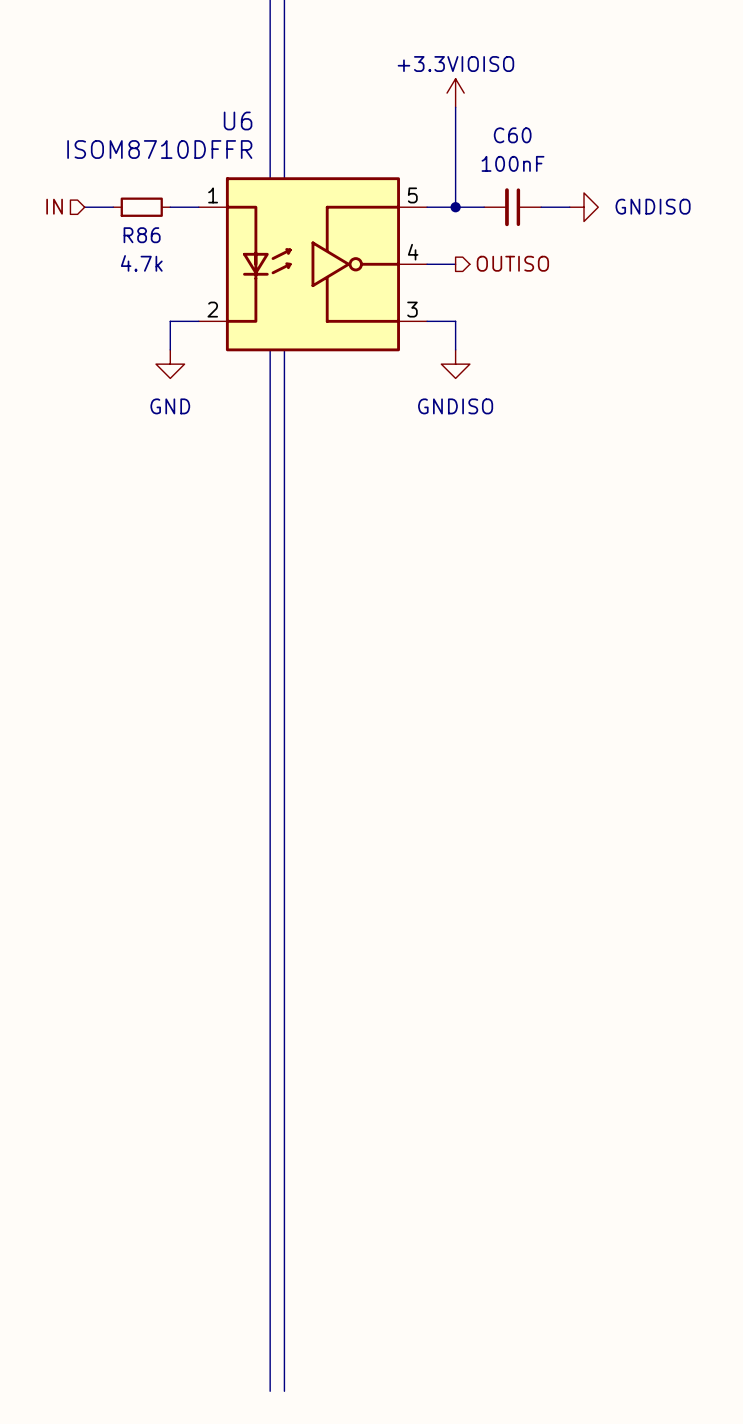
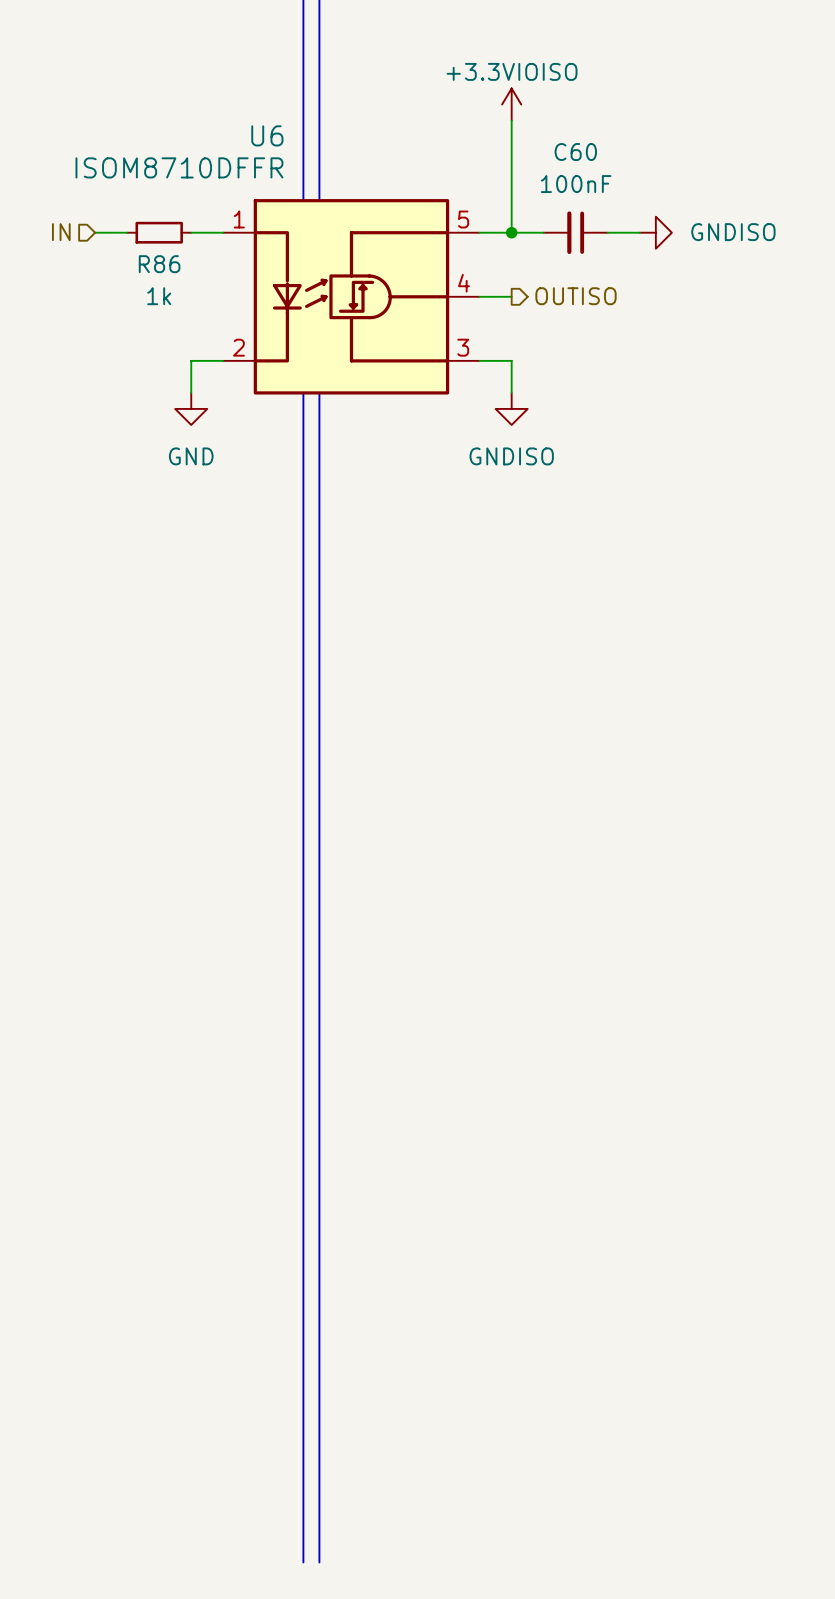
U6 symbol: [198, 177, 428, 352] -> [223, 199, 480, 395]
R86 value: 4.7k (141, 263) -> 1k (159, 296)

